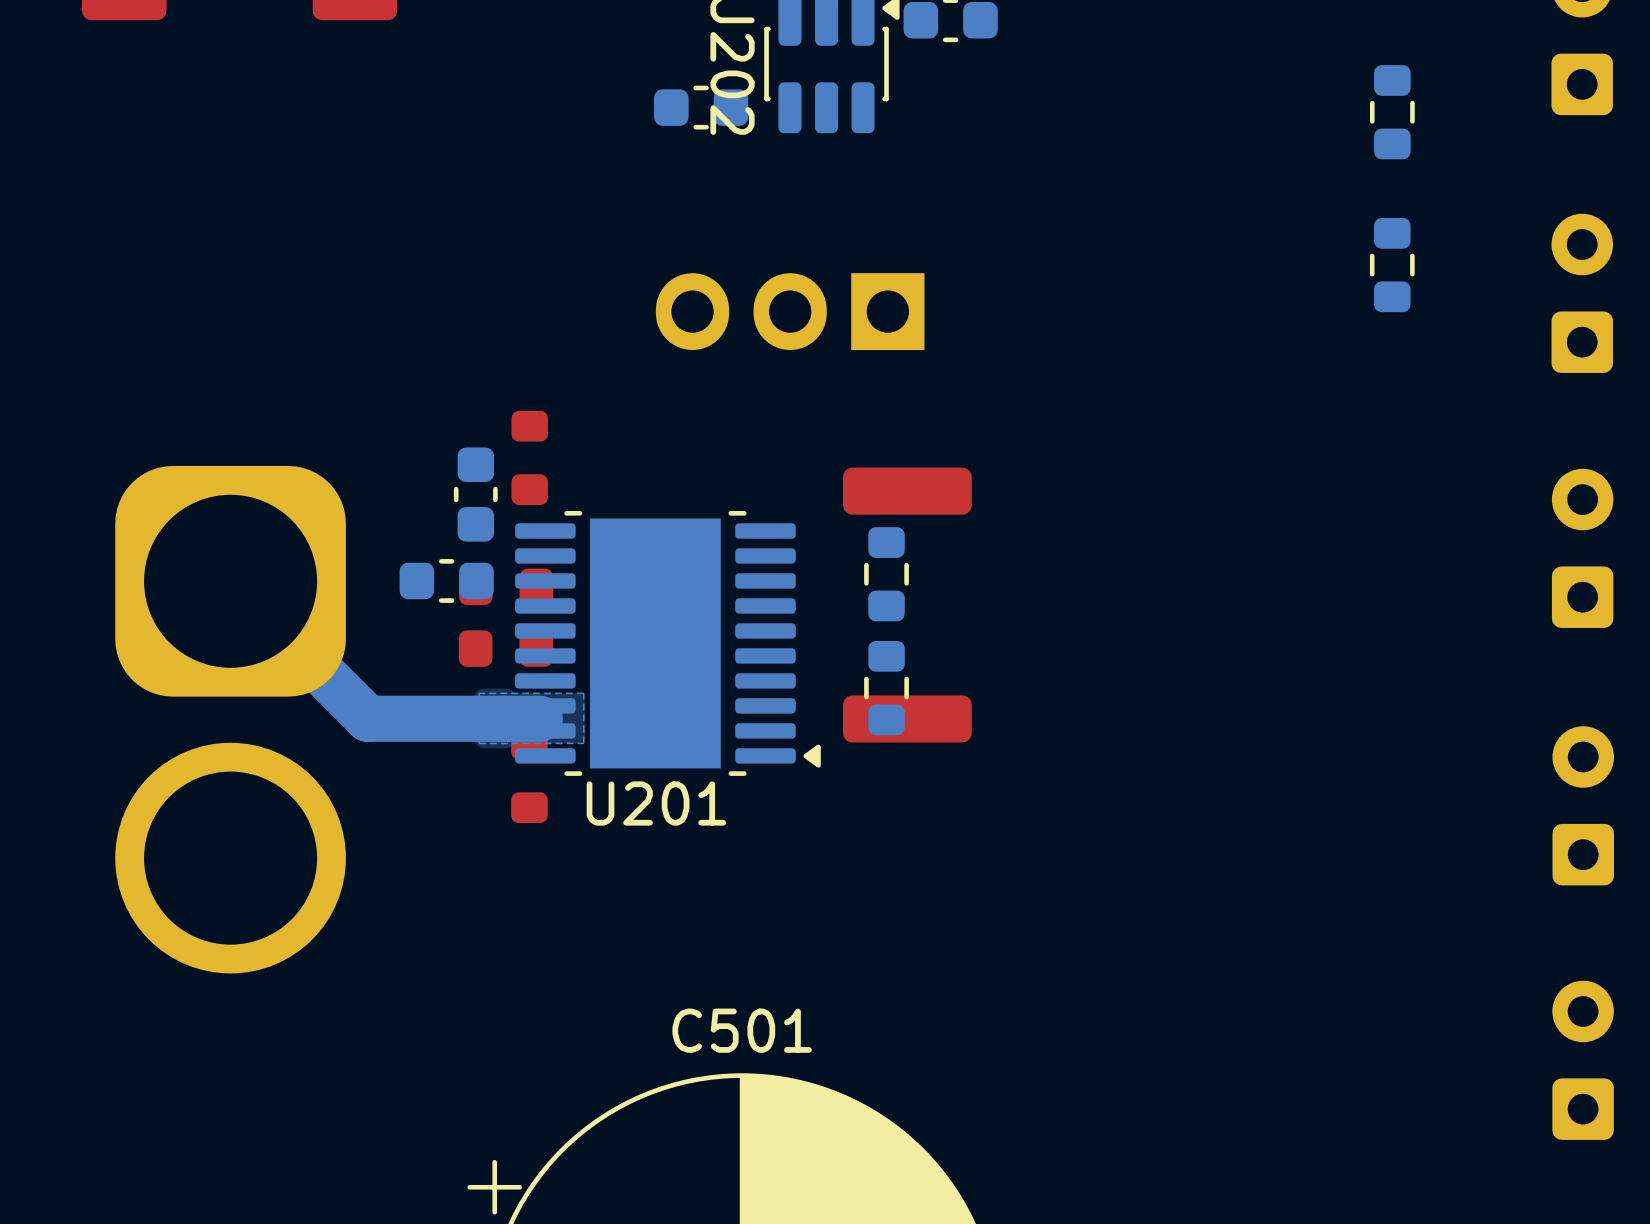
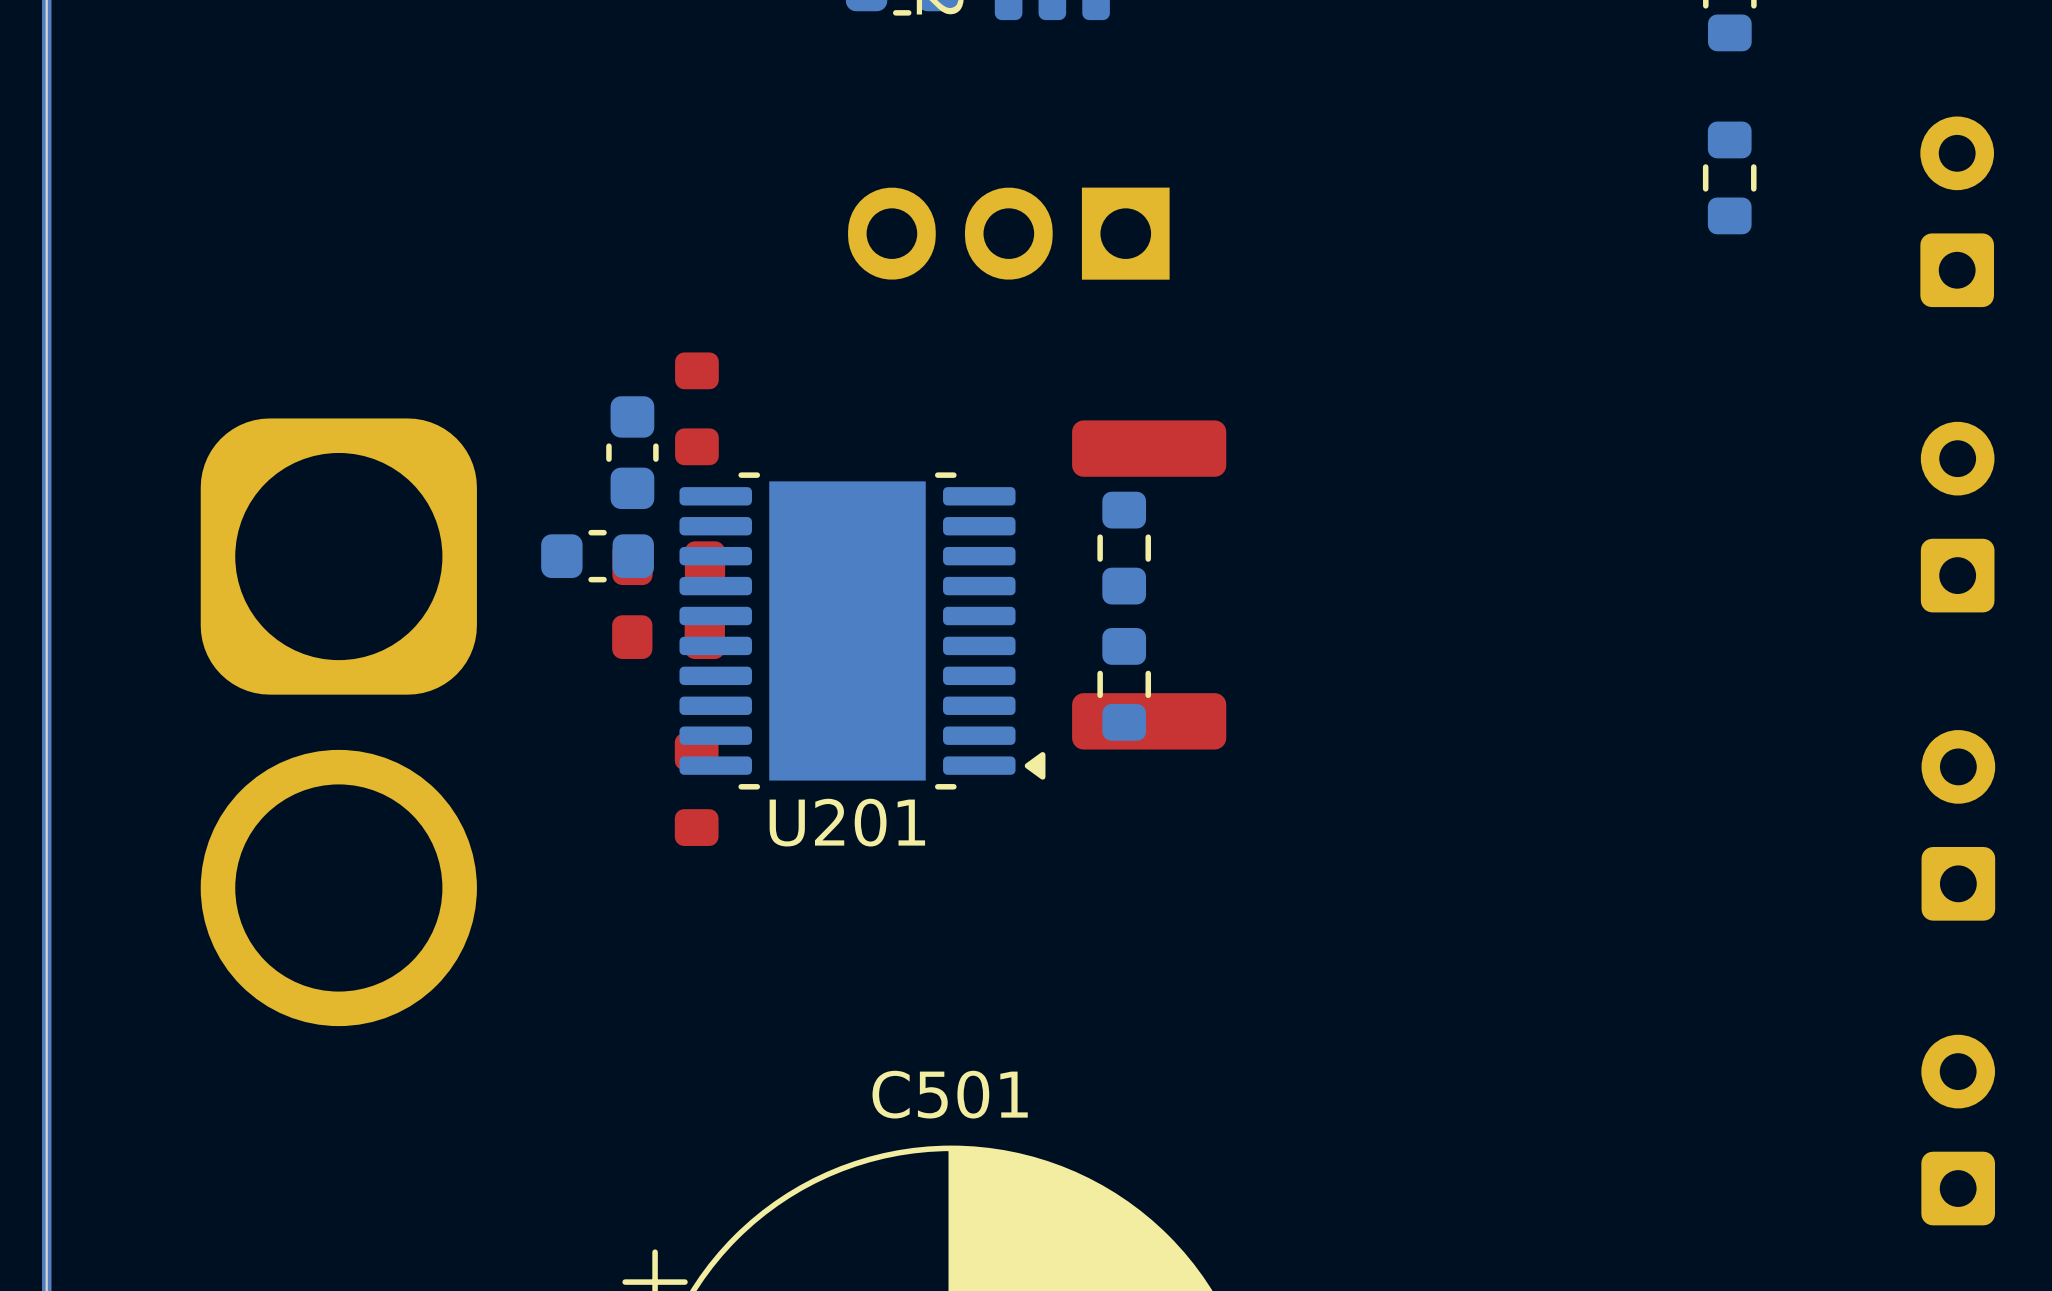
bottom track: (230, 581) (368, 718) (539, 718) -> none
bottom zone outline: (583, 693) (479, 693) (479, 743) (583, 743) (583, 693) -> none

